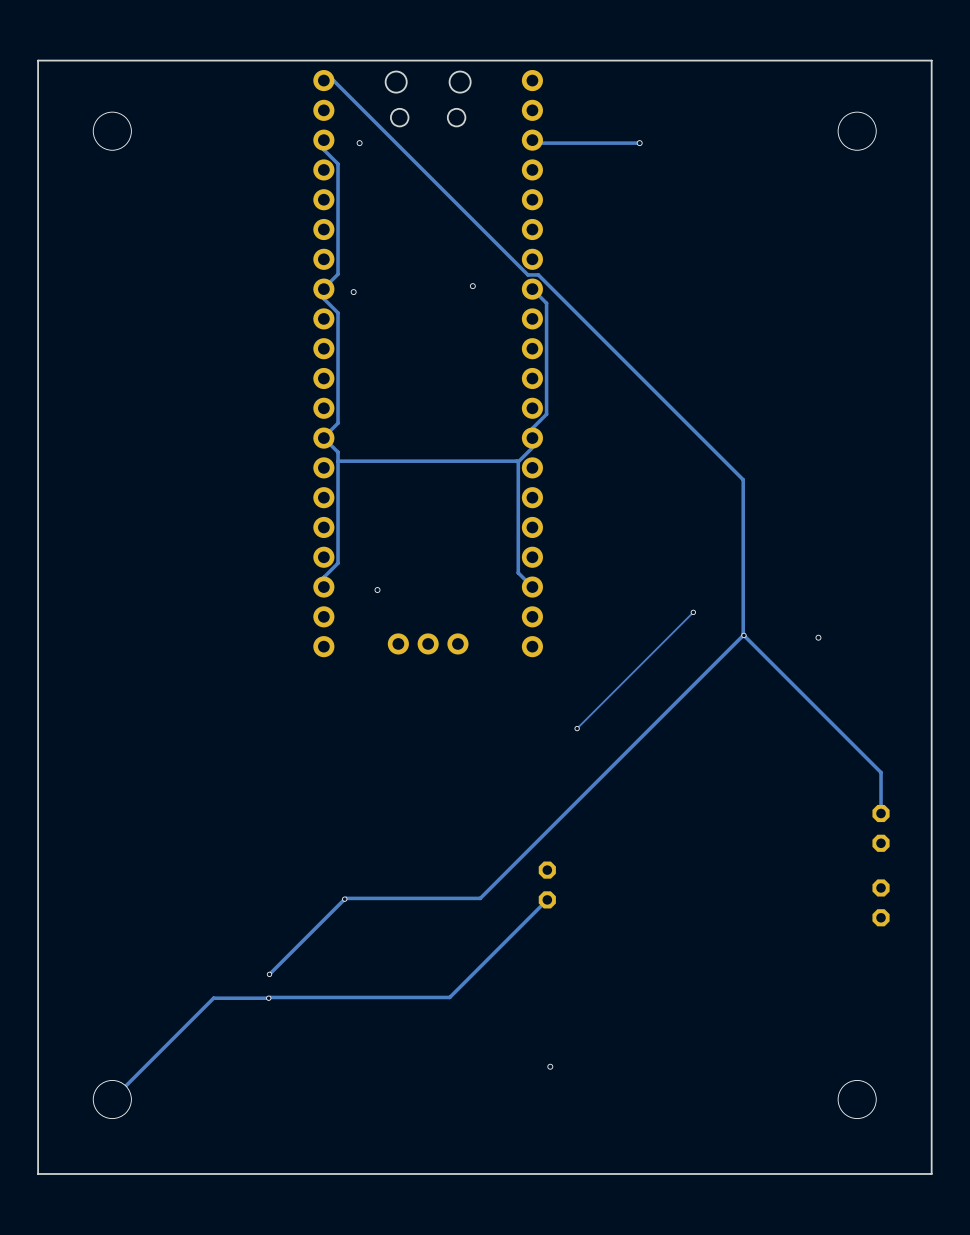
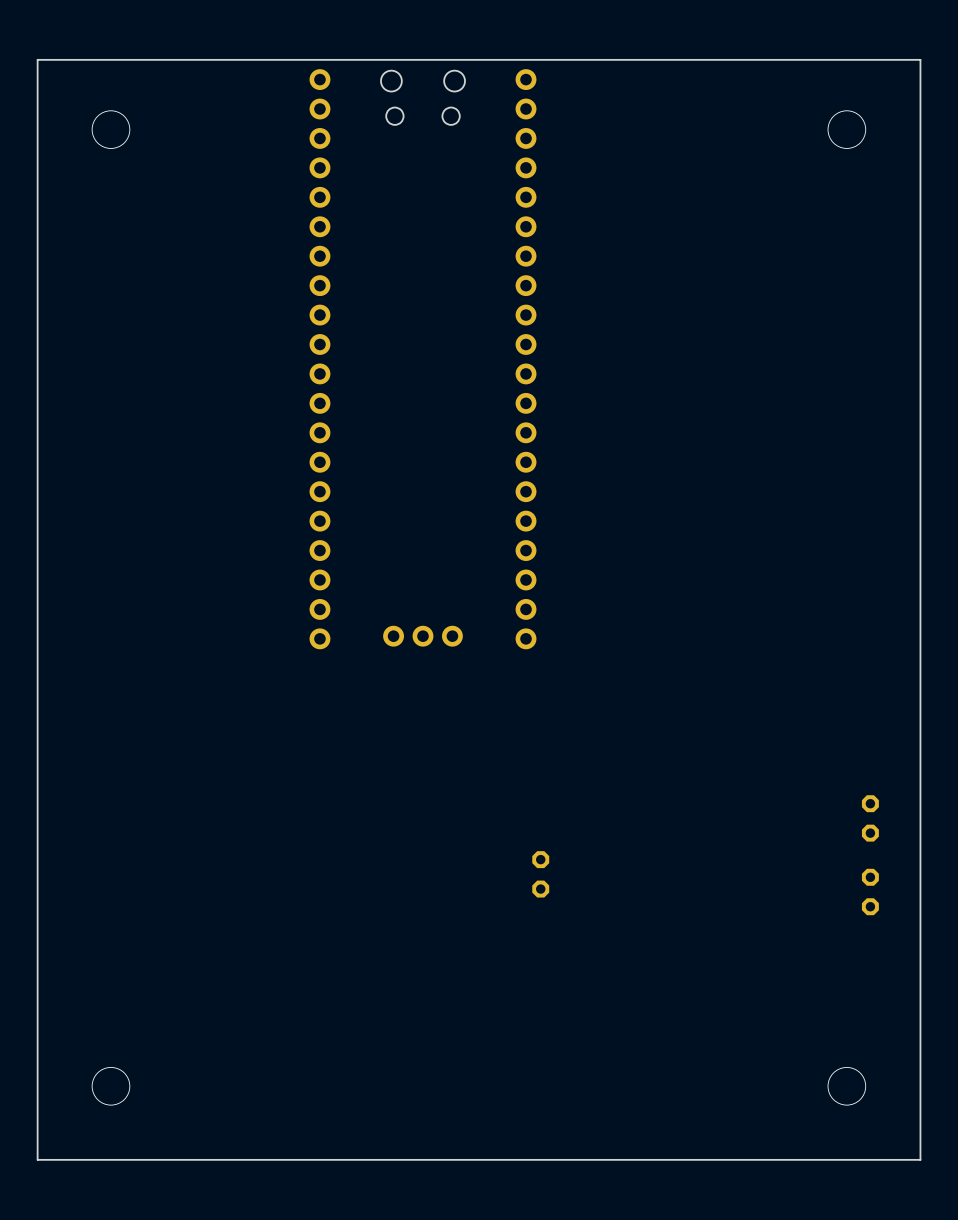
track: (323, 80) (333, 80) (527, 274) (538, 274) (743, 479) (743, 635) -> none
track: (323, 140) (323, 149) (338, 163) (338, 274) (323, 289) (323, 298) (338, 312) (338, 423) (323, 438) (338, 452) (338, 563) (323, 577) (323, 587) -> none
track: (532, 140) (535, 143) (639, 143) -> none
via: (359, 143) -> none
via: (639, 143) -> none
via: (472, 286) -> none
track: (532, 289) (546, 303) (546, 414) (532, 428) (531, 448) (518, 461) -> none
via: (353, 292) -> none
track: (338, 461) (518, 461) -> none
track: (518, 461) (518, 572) (532, 587) -> none
via: (377, 590) -> none
track: (693, 612) (577, 728) -> none
via: (693, 612) -> none
track: (743, 635) (881, 772) (881, 813) -> none
track: (743, 635) (480, 898) (346, 898) (269, 974) -> none
via: (743, 635) -> none
via: (818, 637) -> none
via: (577, 728) -> none
via: (344, 899) -> none
track: (547, 899) (449, 997) (213, 998) (112, 1099) -> none
via: (269, 974) -> none
via: (268, 998) -> none
via: (550, 1066) -> none

